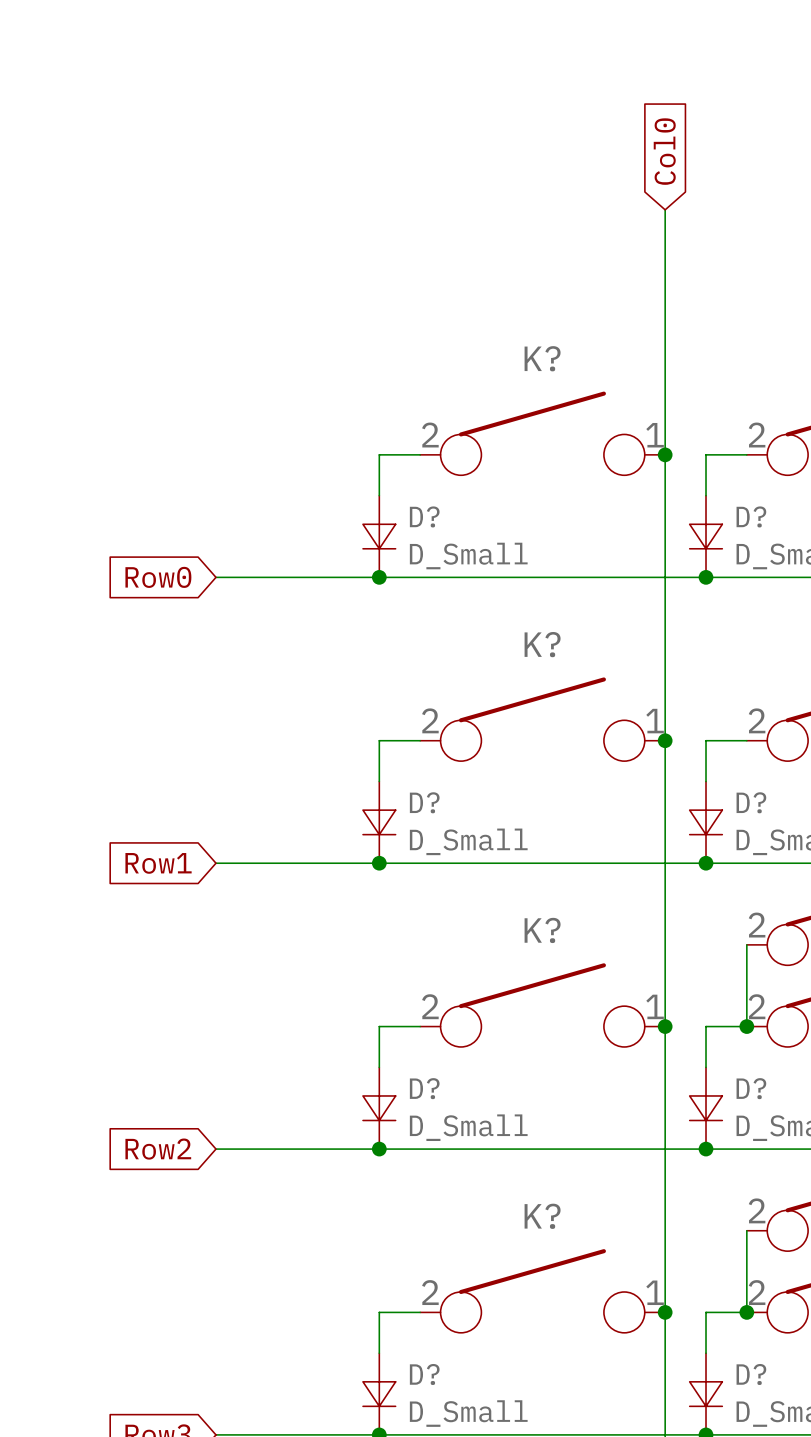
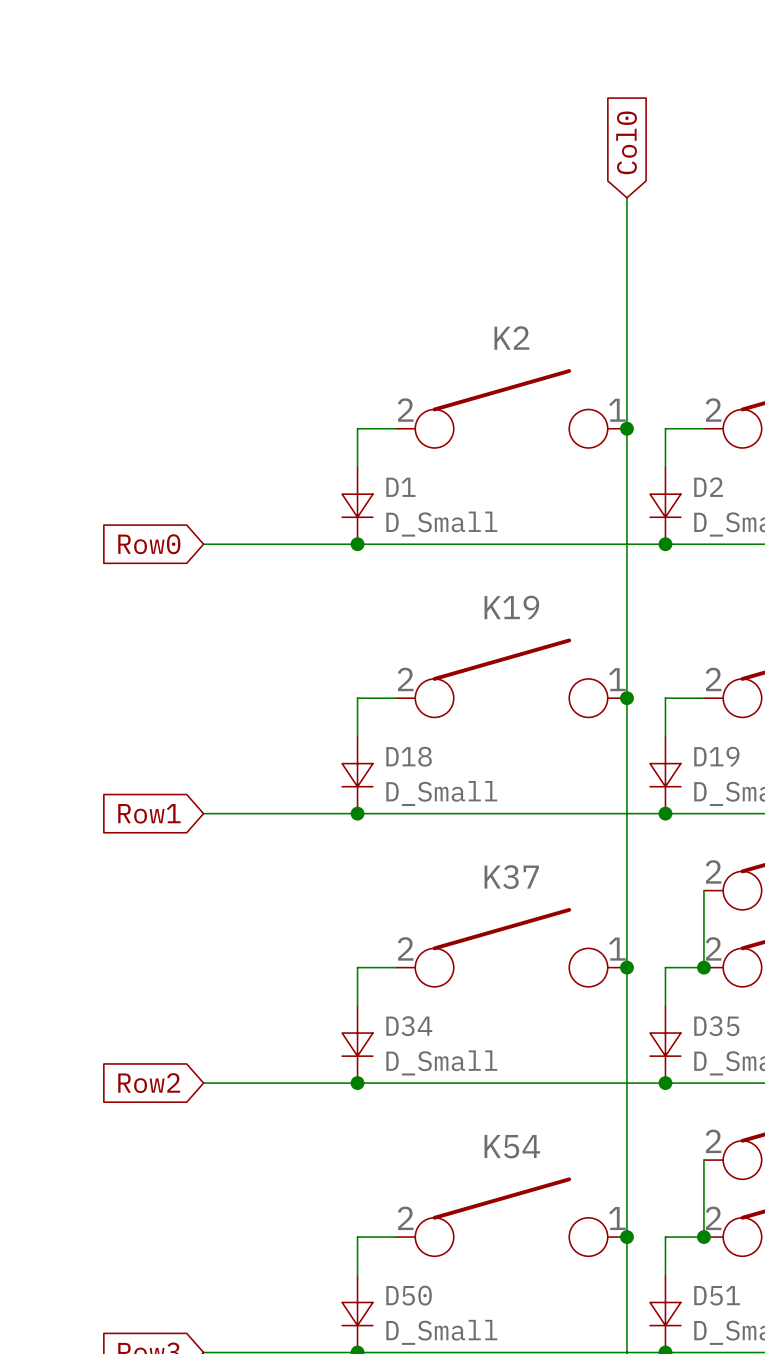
K? name: K? (542, 358) -> K2 (511, 338)
D? name: D? (424, 516) -> D1 (400, 487)
D? name: D? (751, 516) -> D2 (708, 487)
K? name: K? (542, 644) -> K19 (511, 607)
D? name: D? (424, 802) -> D18 (409, 756)
D? name: D? (751, 802) -> D19 (716, 756)
K? name: K? (542, 930) -> K37 (511, 877)
D? name: D? (424, 1088) -> D34 (409, 1026)
D? name: D? (751, 1088) -> D35 (716, 1026)
K? name: K? (542, 1216) -> K54 (512, 1146)
D? name: D? (424, 1374) -> D50 (409, 1295)
D? name: D? (751, 1374) -> D51 (717, 1295)

